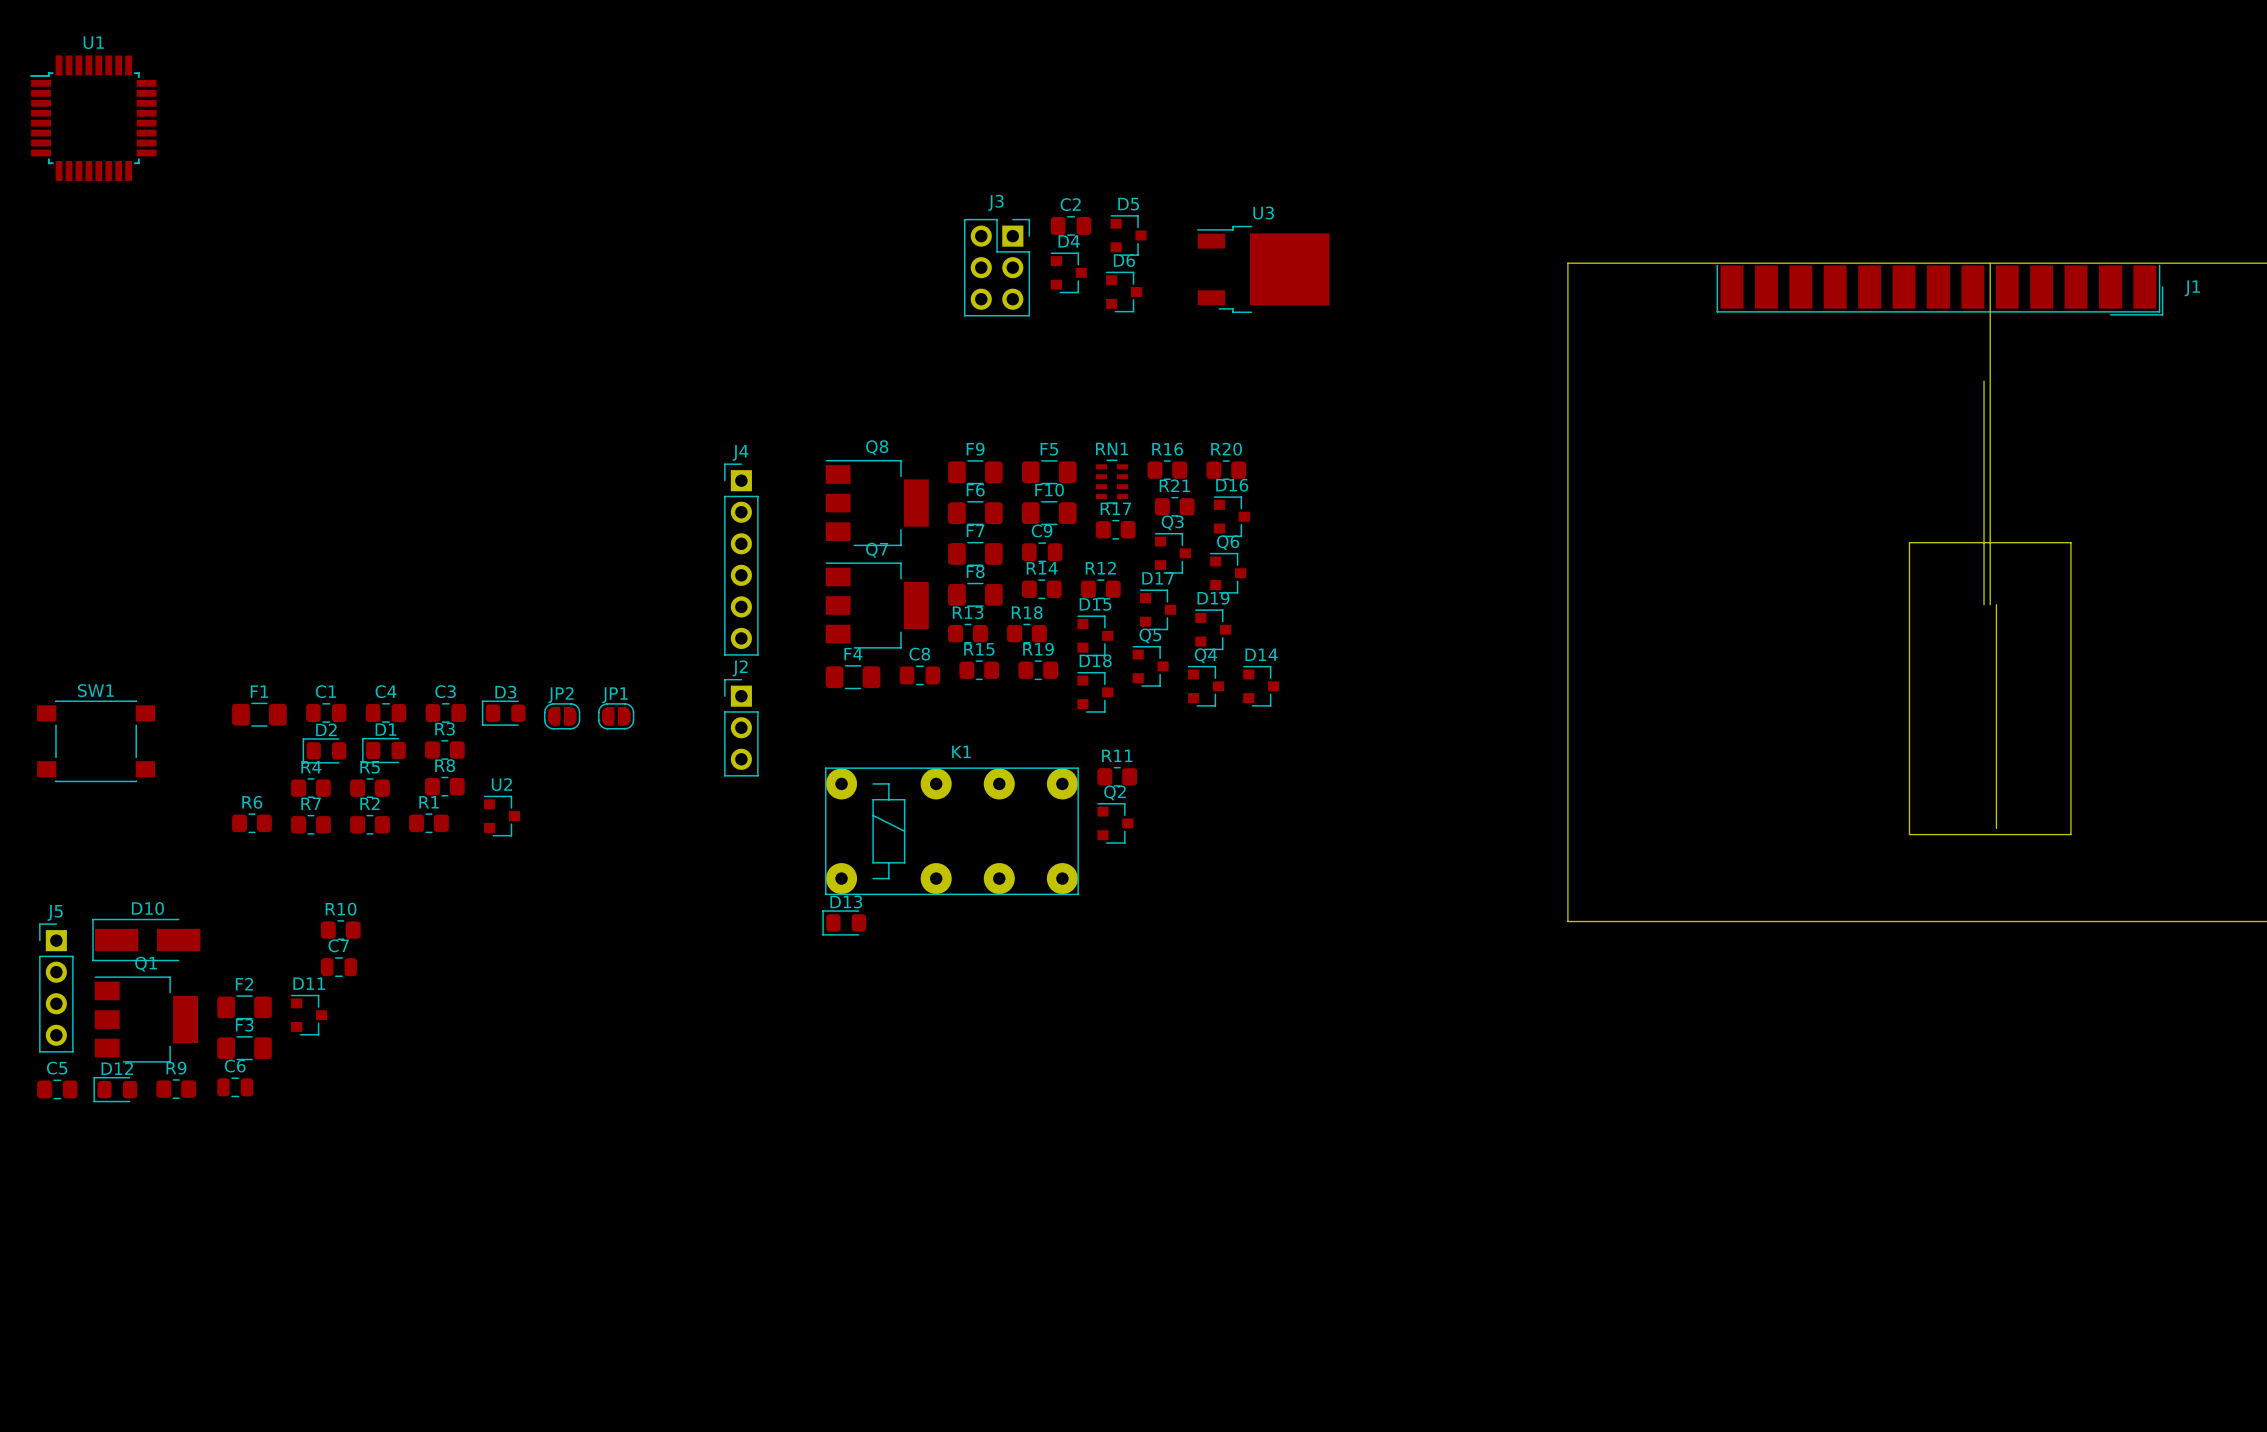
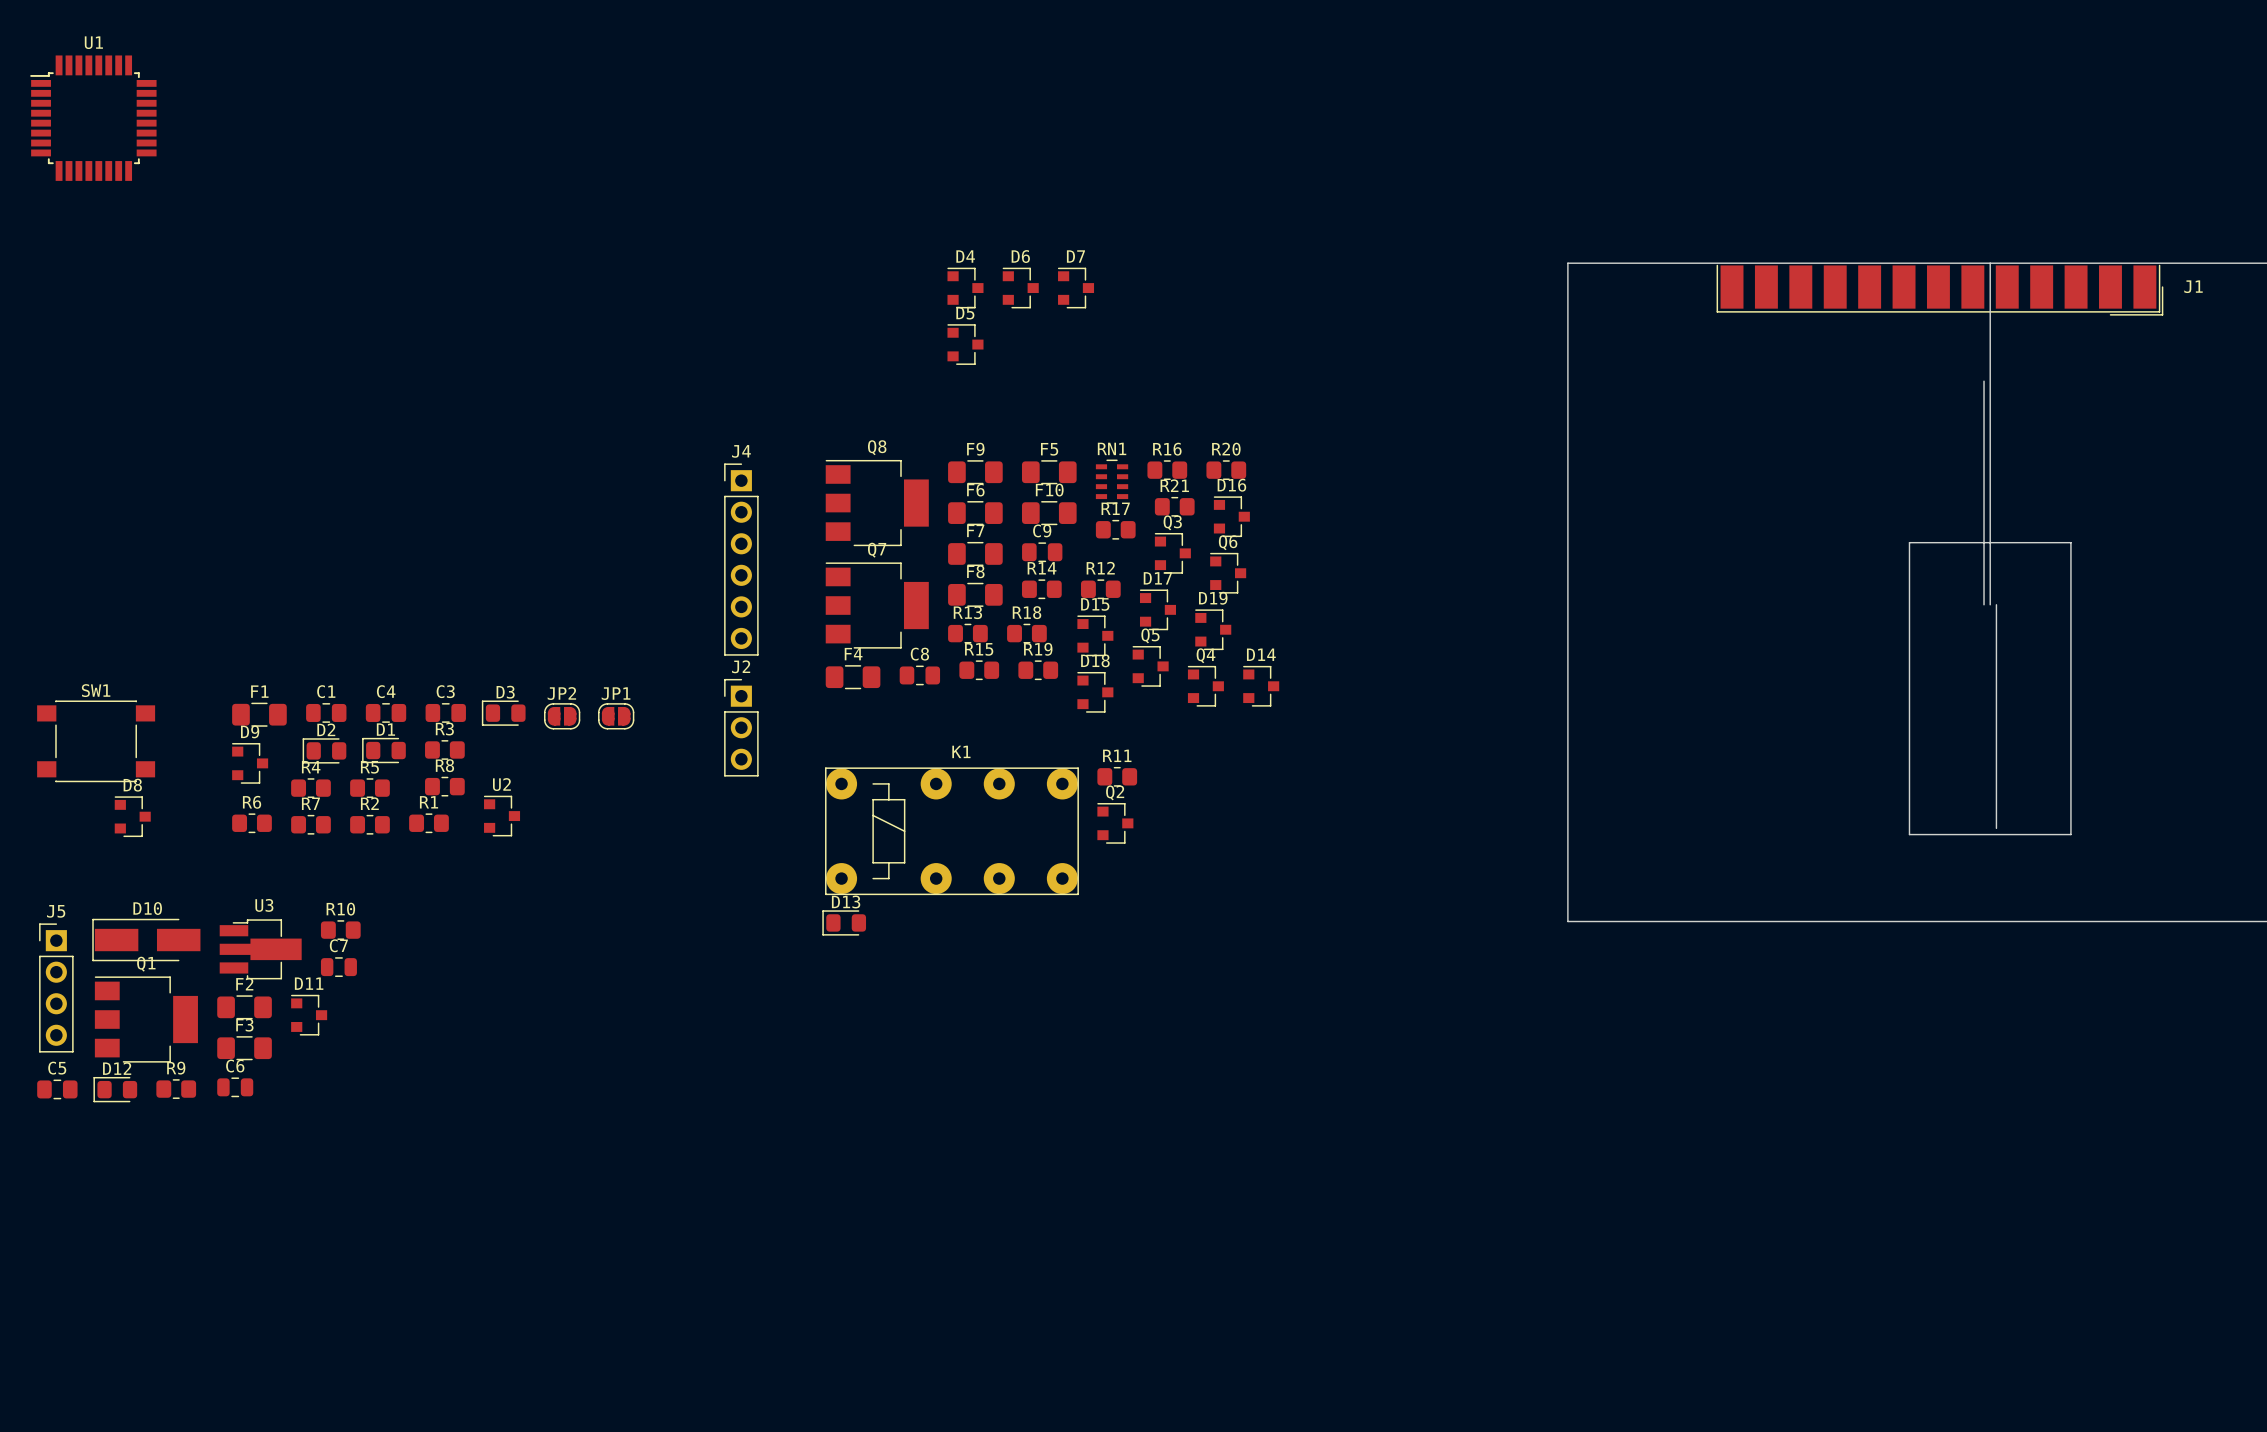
C2: (1071, 225) -> none
U3 footprint: [1197, 225, 1330, 314] -> [219, 919, 302, 980]
D5 position: (1128, 235) -> (965, 344)
J3: (997, 267) -> none
D4 position: (1068, 272) -> (965, 288)
D7: none -> (1075, 288)
D6 position: (1124, 292) -> (1020, 288)
D9: none -> (250, 763)
D8: none -> (132, 816)

